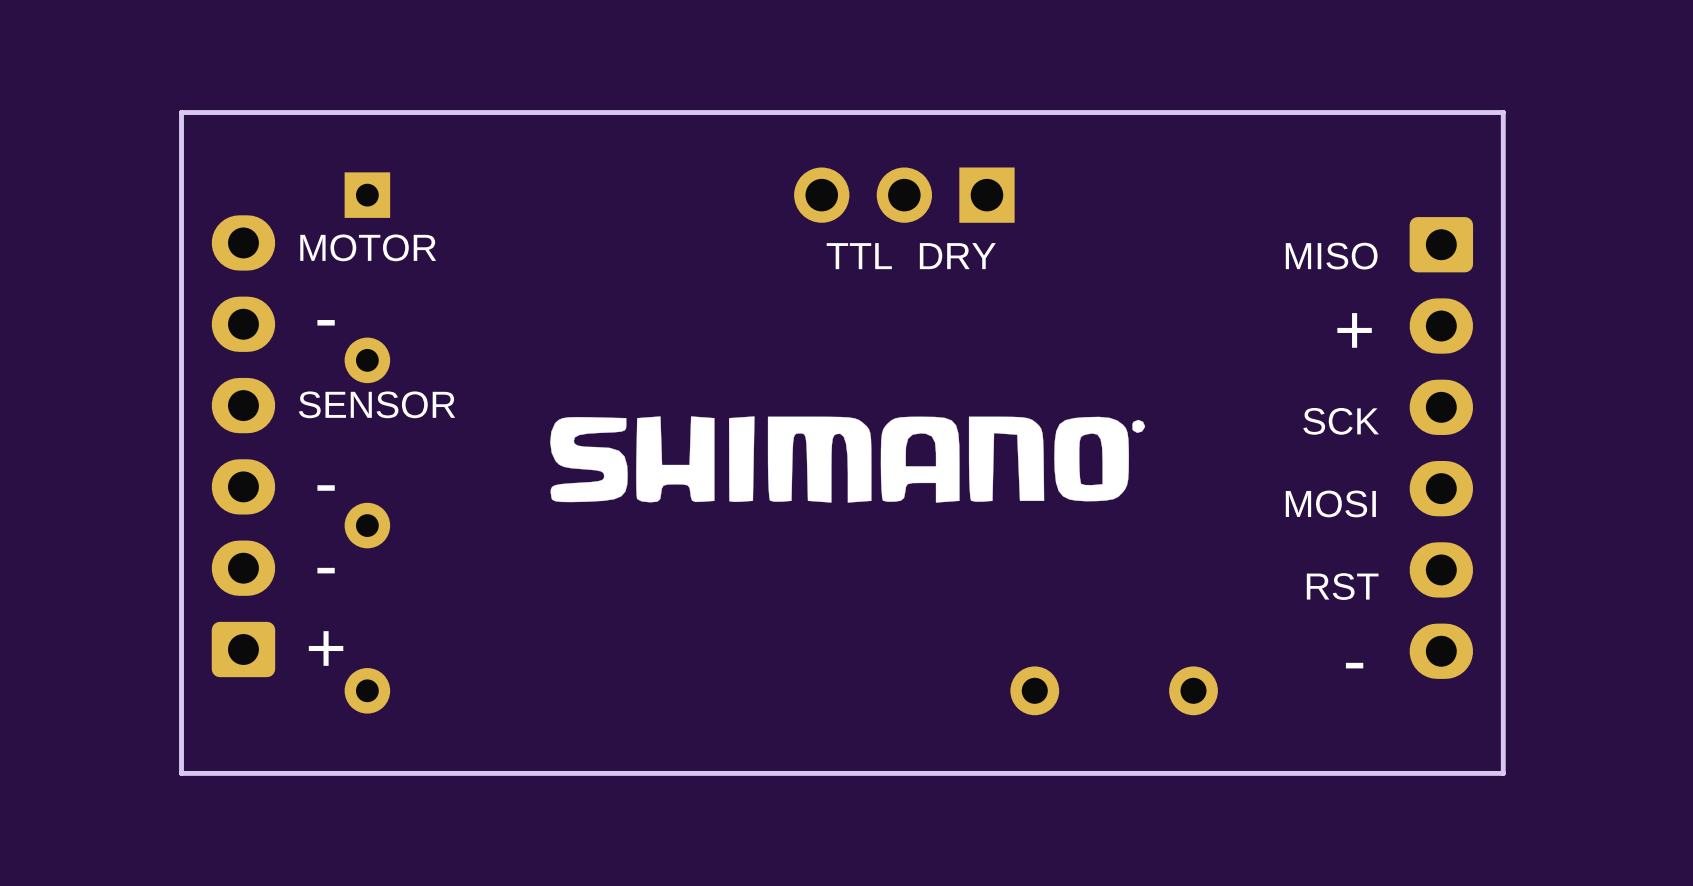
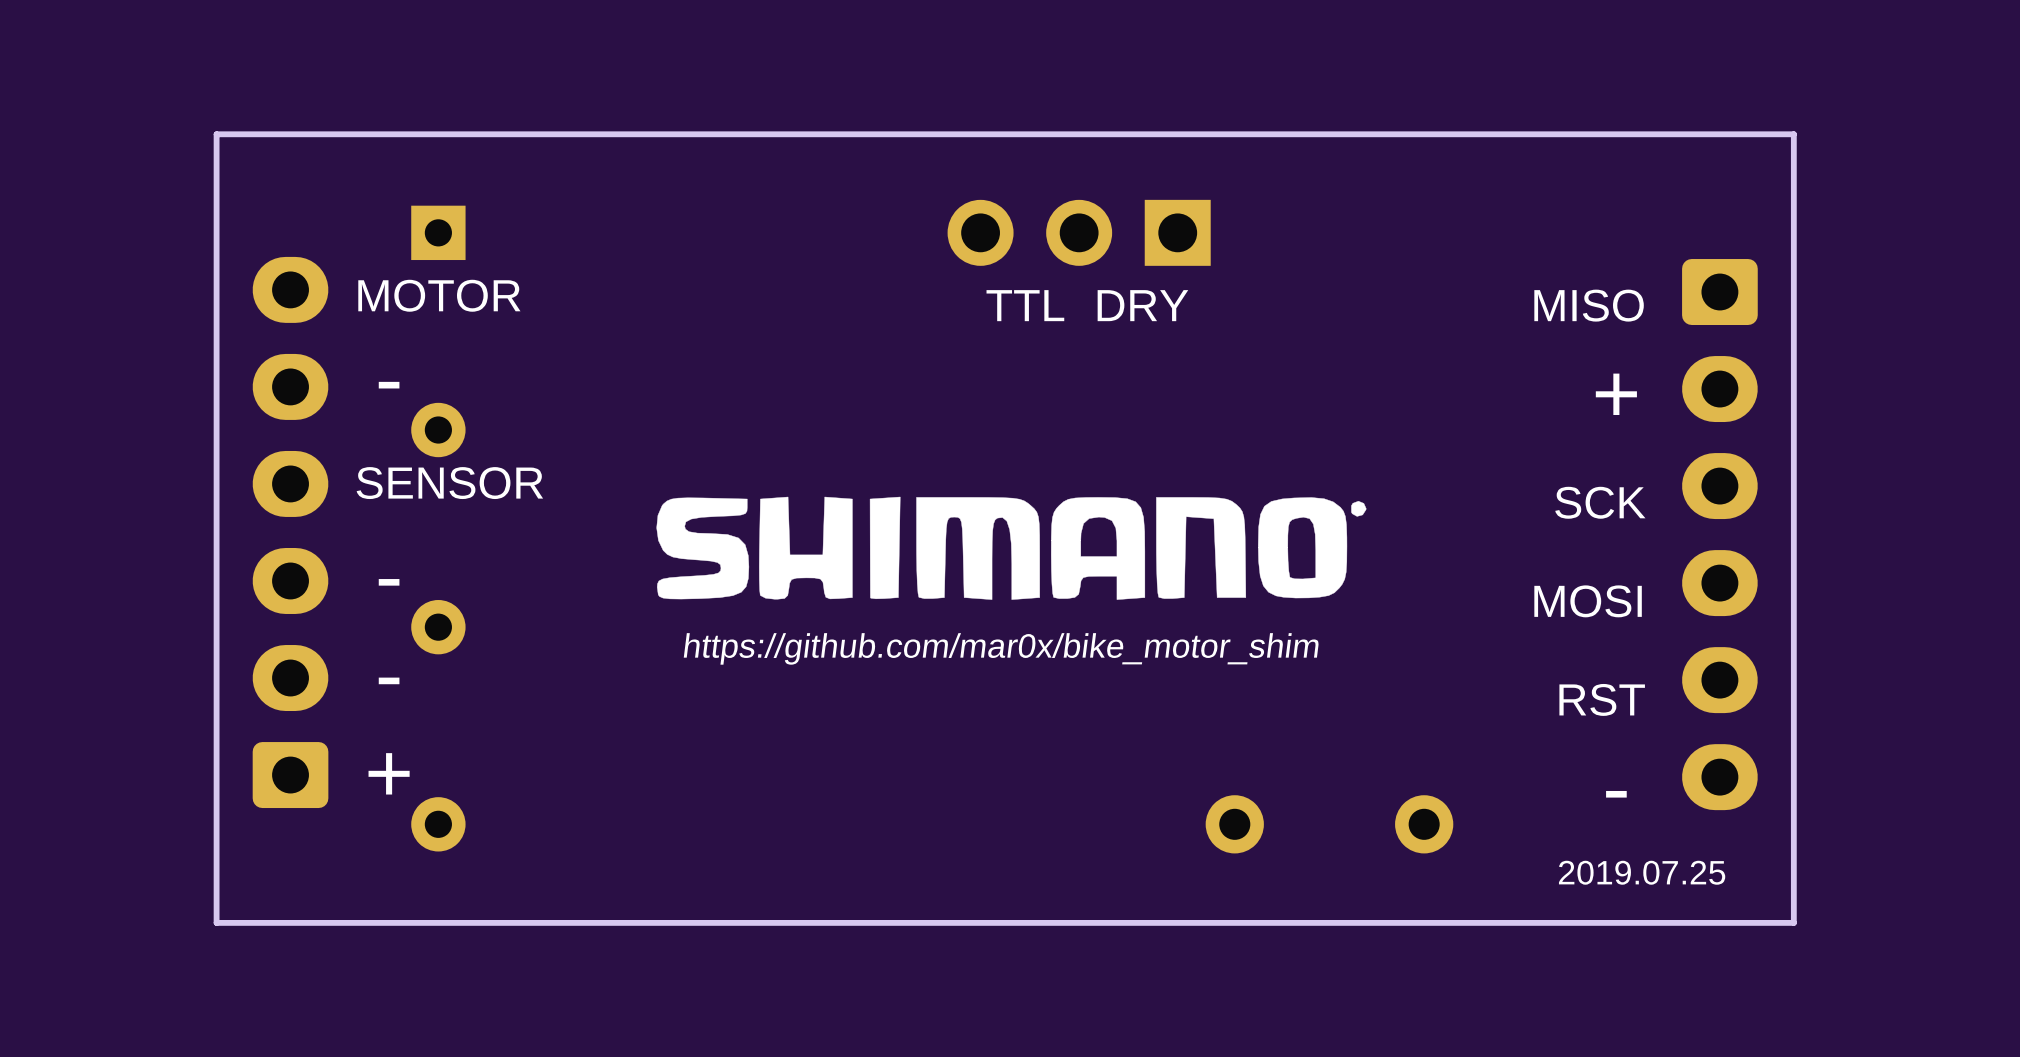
text: none -> https://github.com/mar0x/bike_motor_shim (1001, 648)
text: none -> 2019.07.25 (1642, 872)

